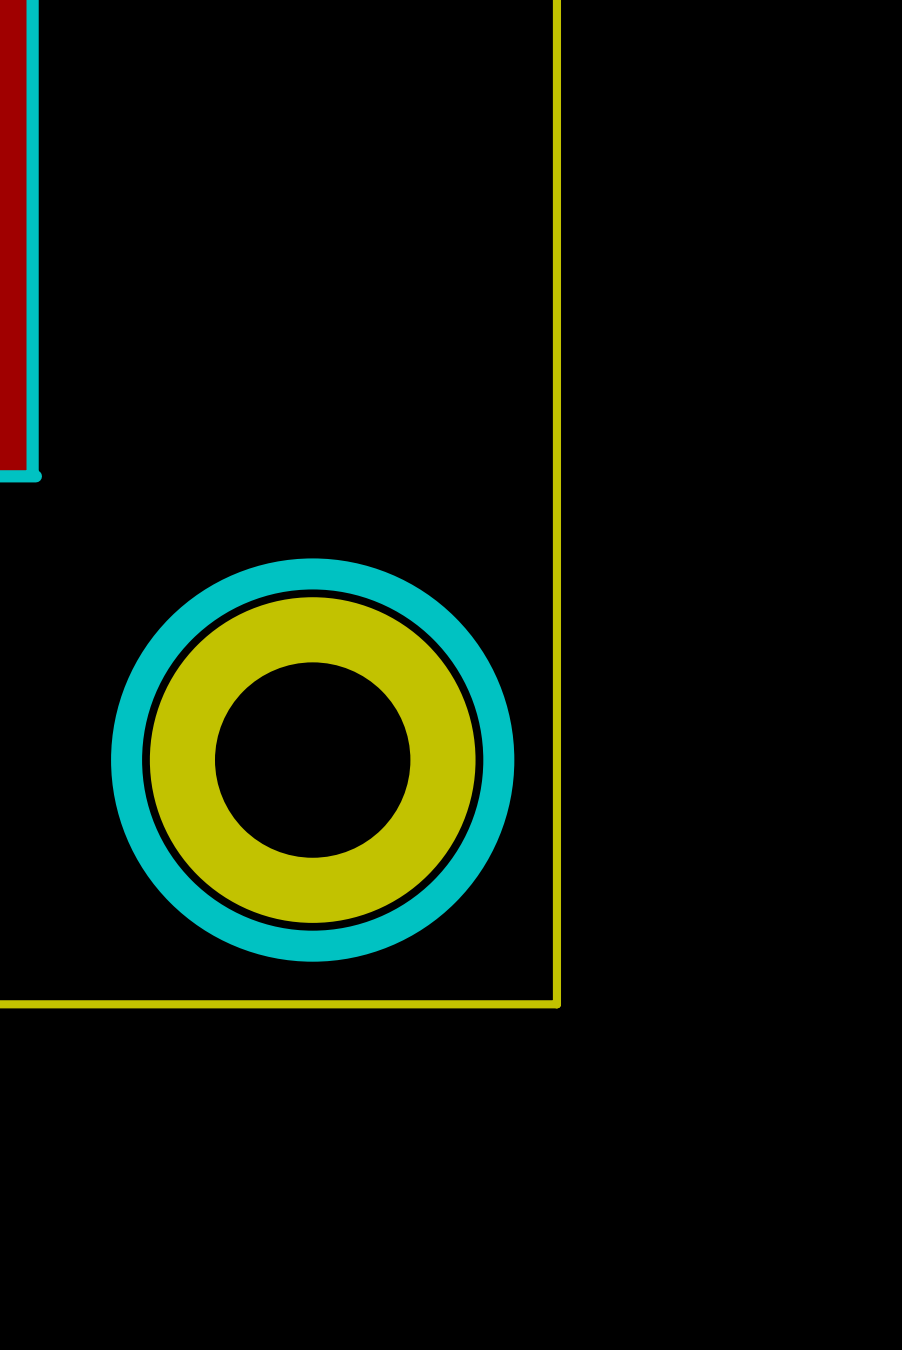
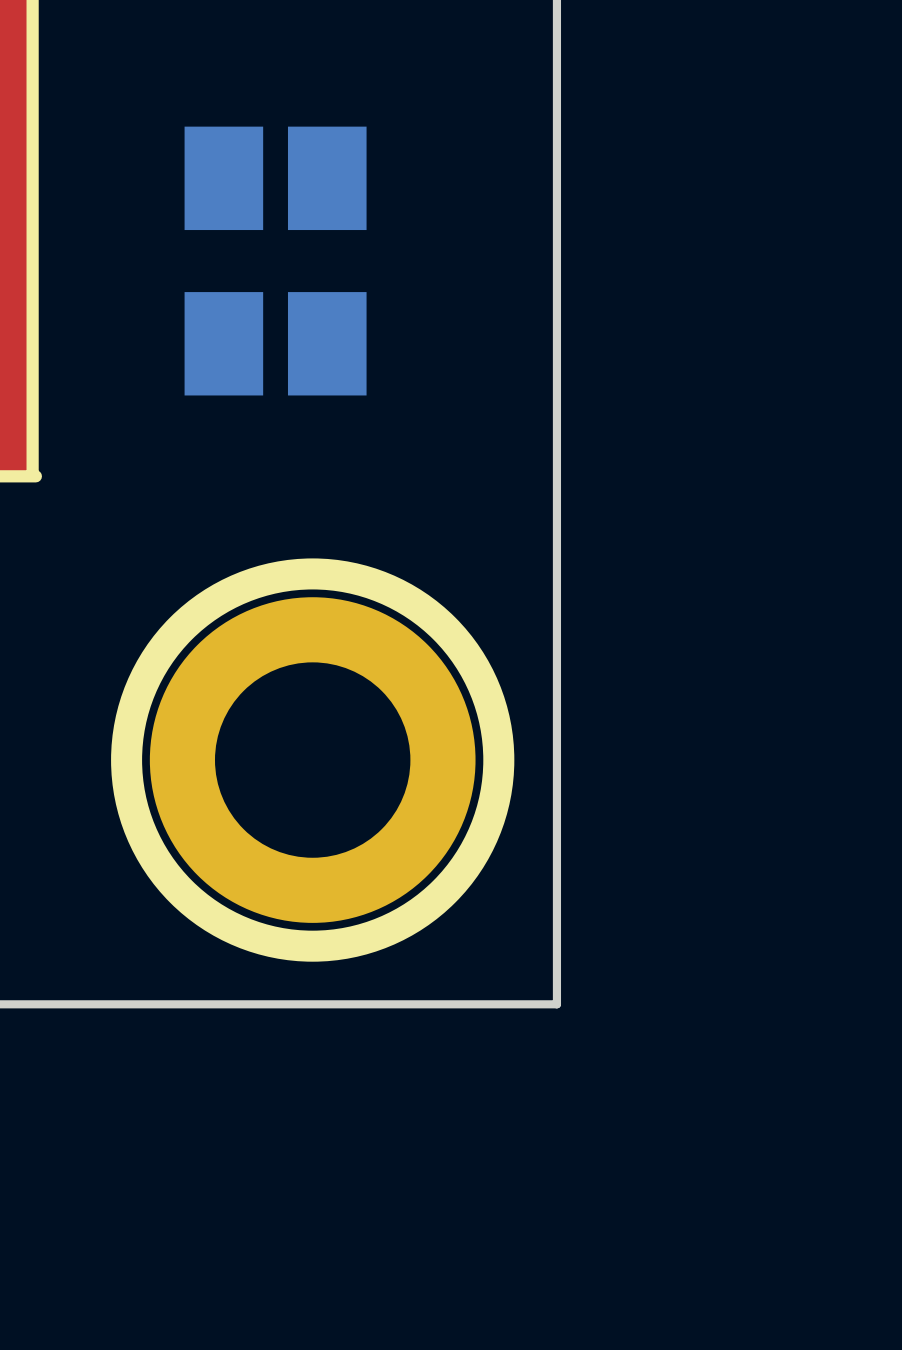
part: none -> (275, 178)
part: none -> (275, 343)

